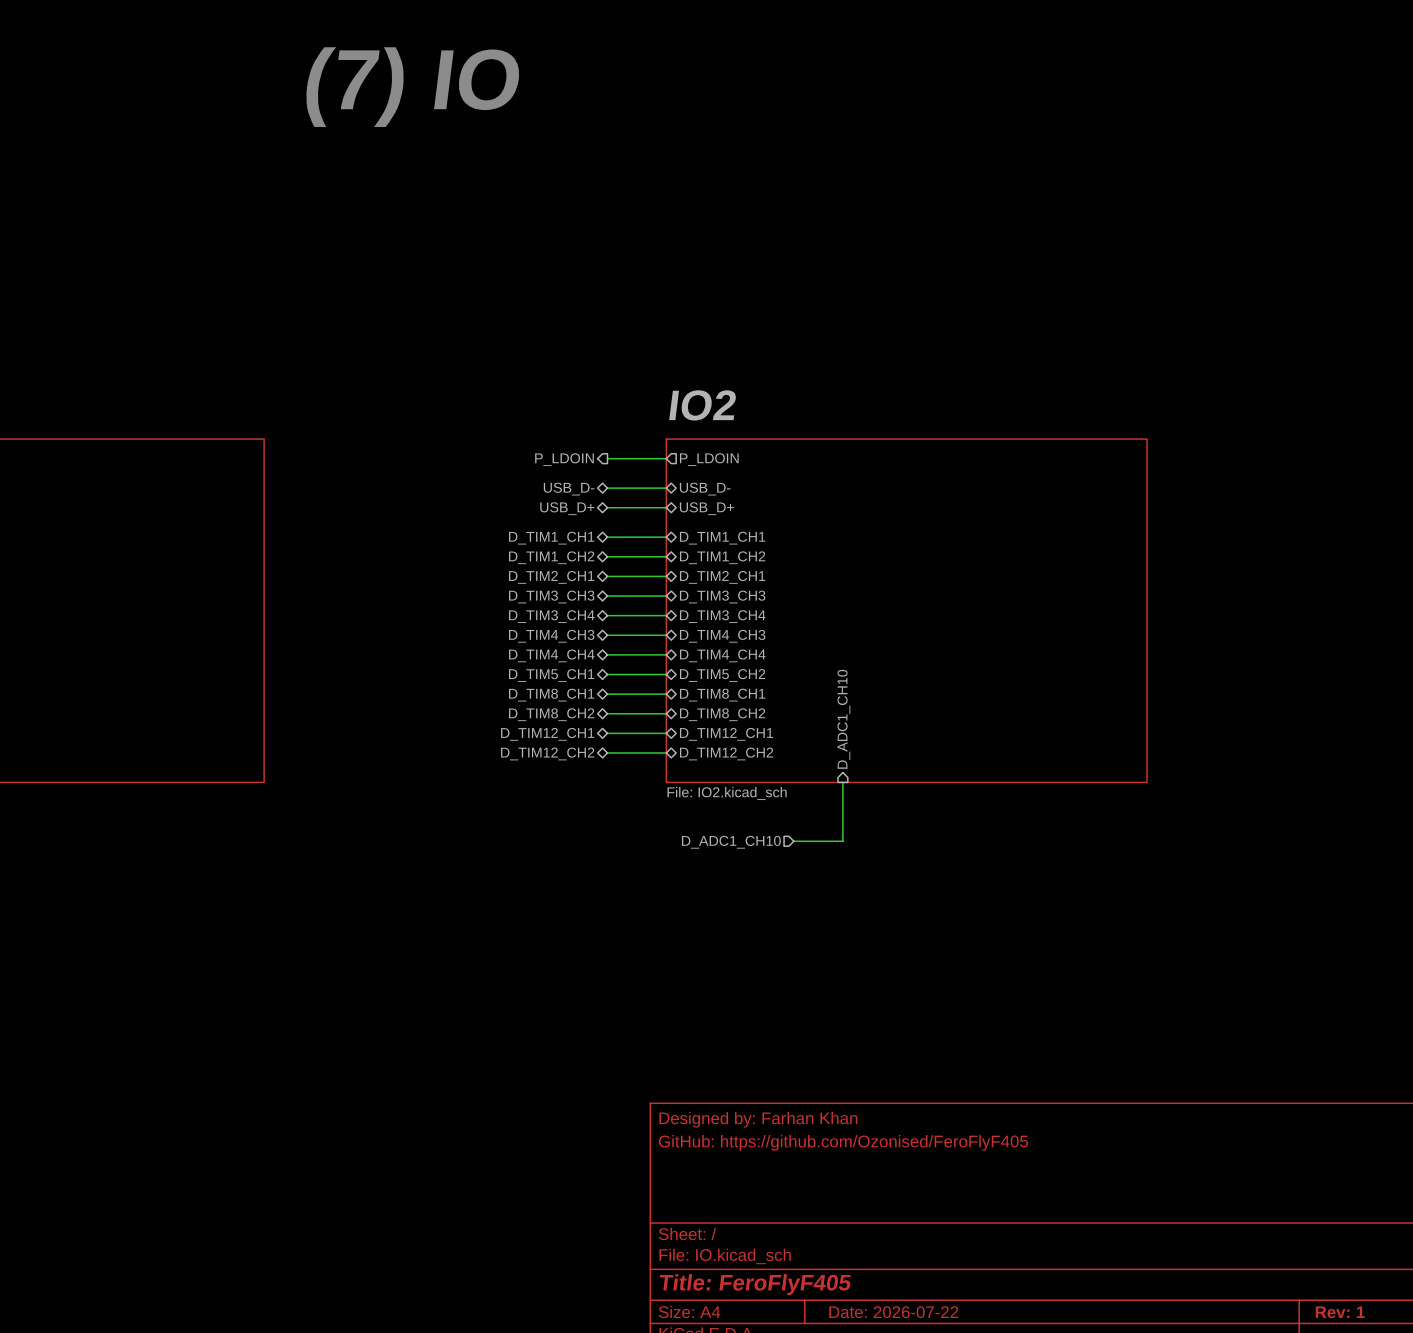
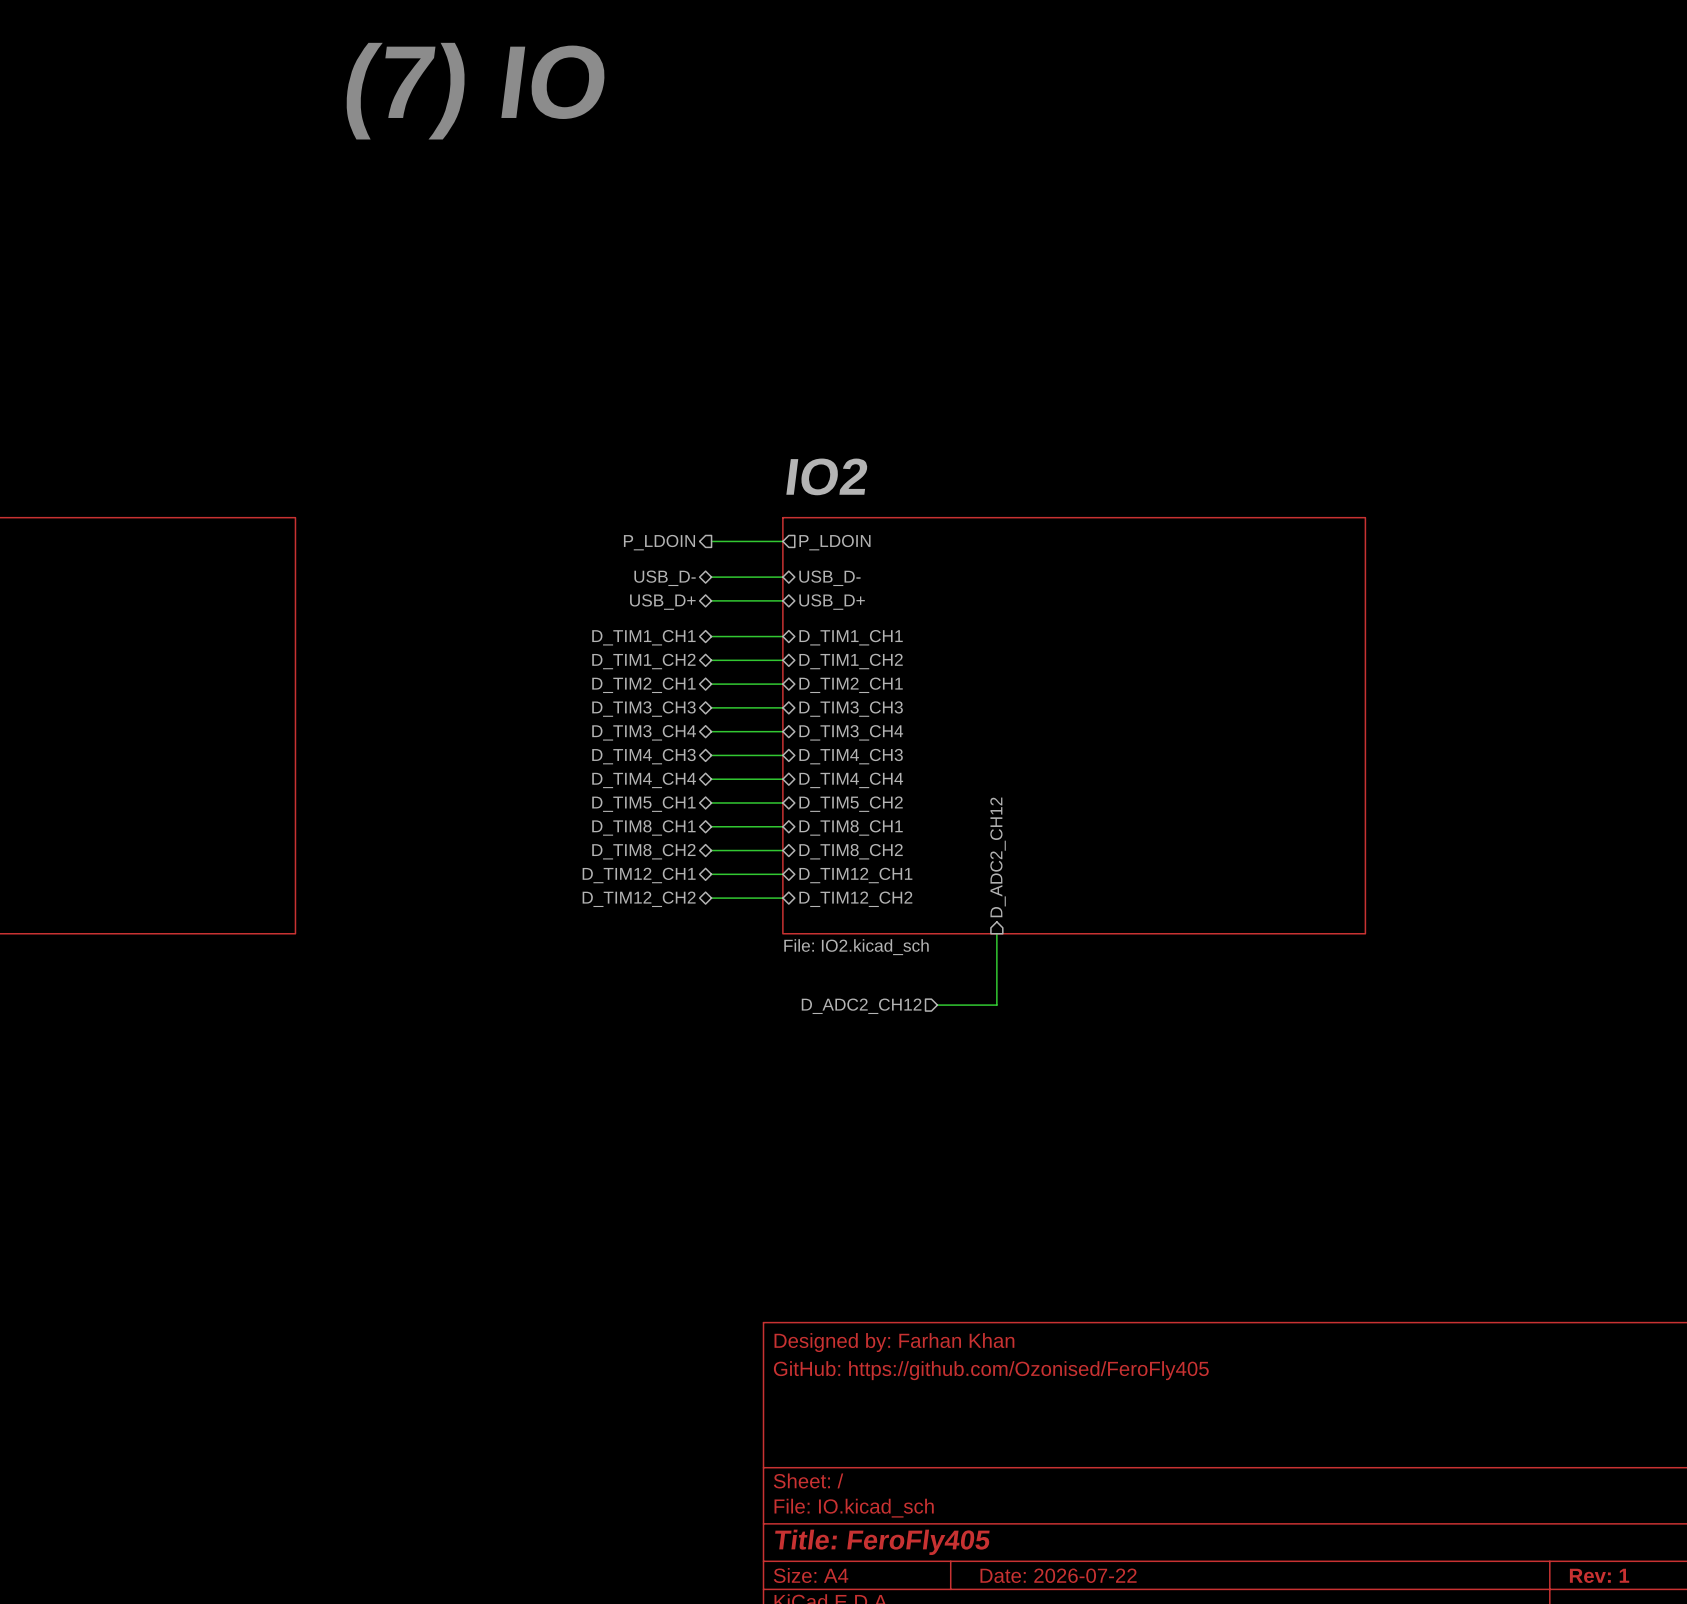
sheet pin: D_ADC1_CH10 (843, 719) -> D_ADC2_CH12 (998, 857)
hierarchical label: D_ADC1_CH10 (731, 842) -> D_ADC2_CH12 (861, 1006)
title block: GitHub: https://github.com/Ozonised/FeroFlyF405 (843, 1142) -> GitHub: https://github.com/Ozonised/FeroFly405 (991, 1370)
title block: Title: FeroFlyF405 (755, 1284) -> Title: FeroFly405 (882, 1542)

